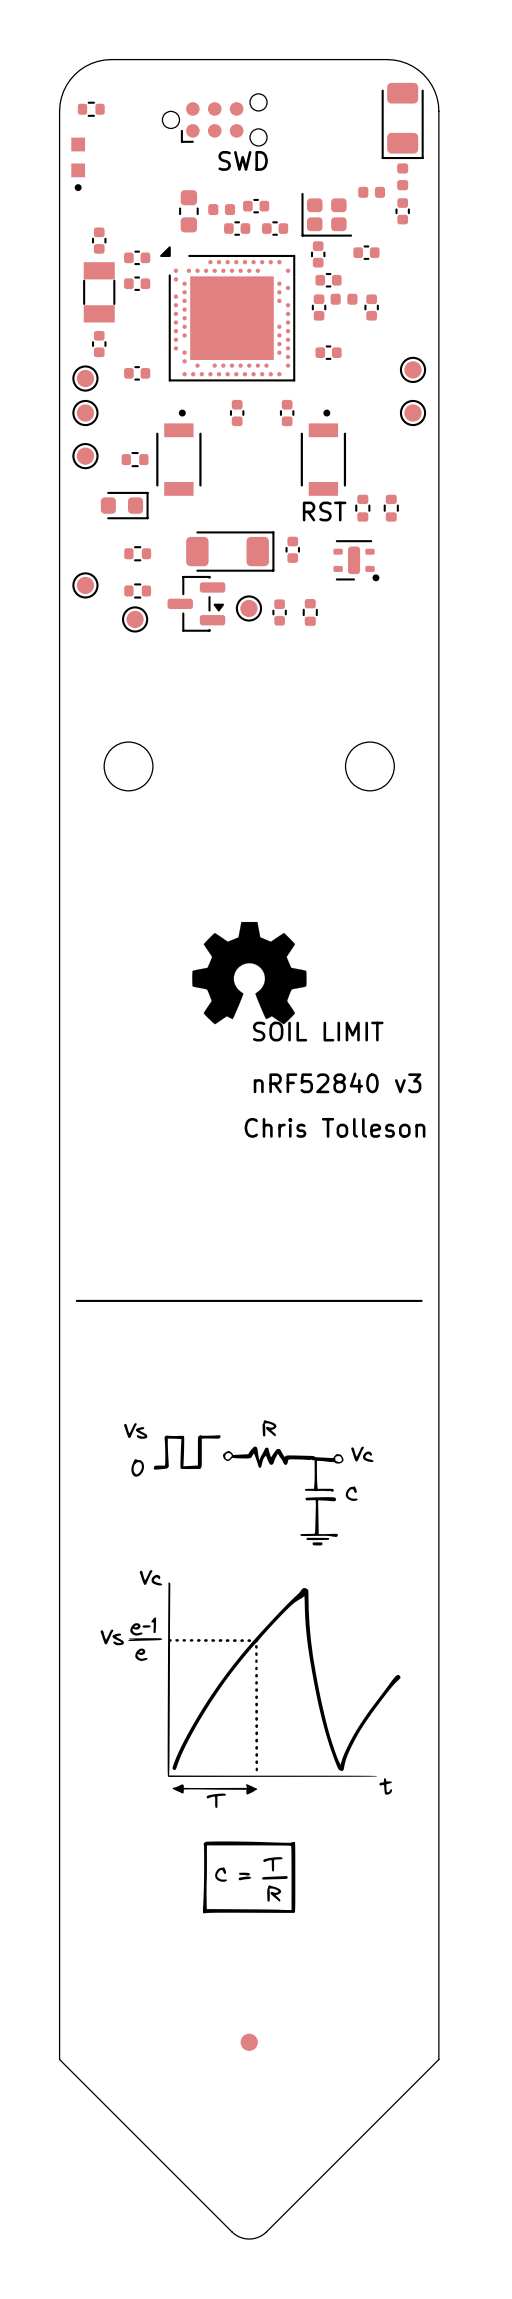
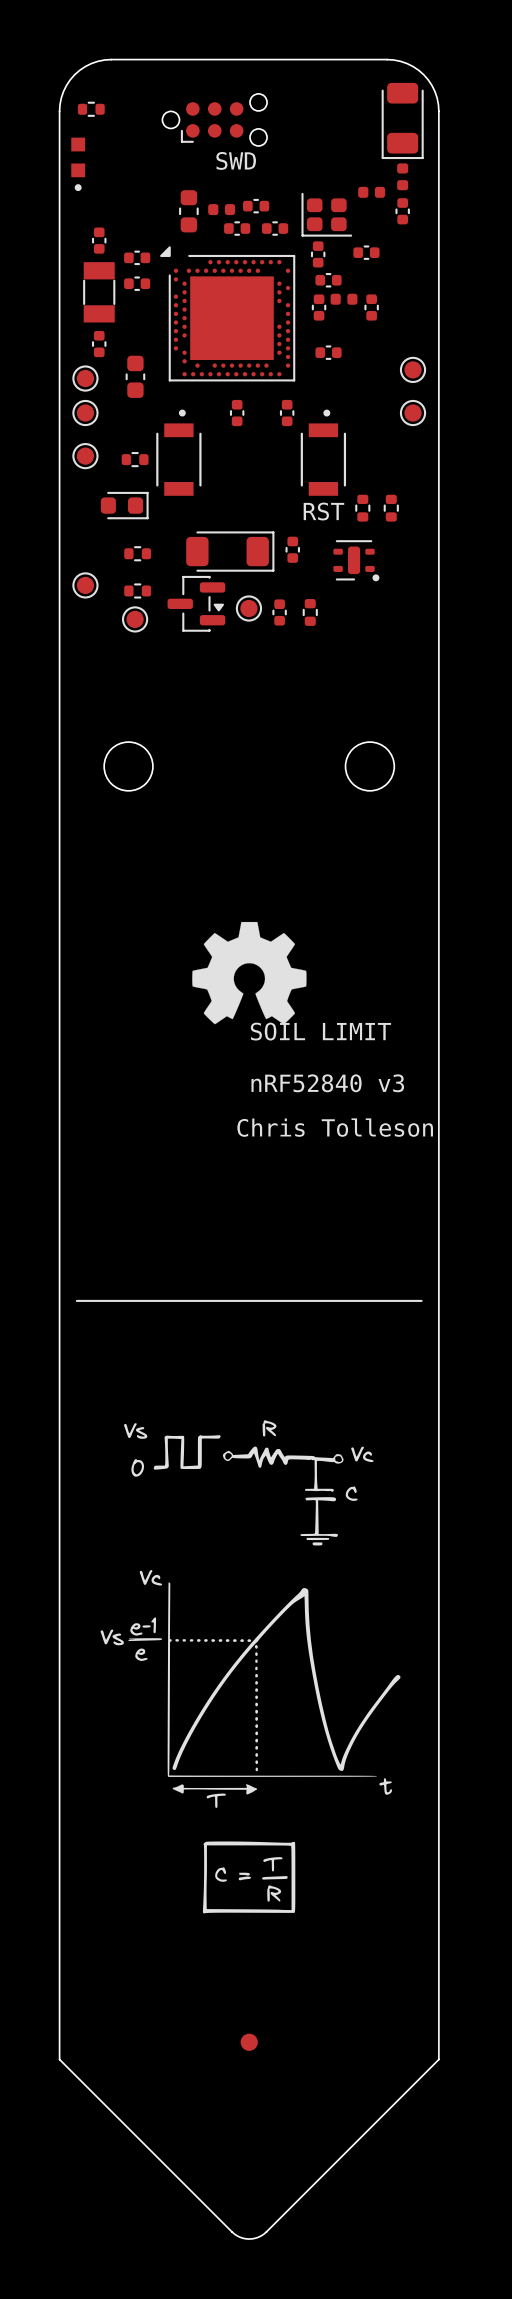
part footprint: [124, 366, 151, 381] -> [125, 355, 146, 398]

